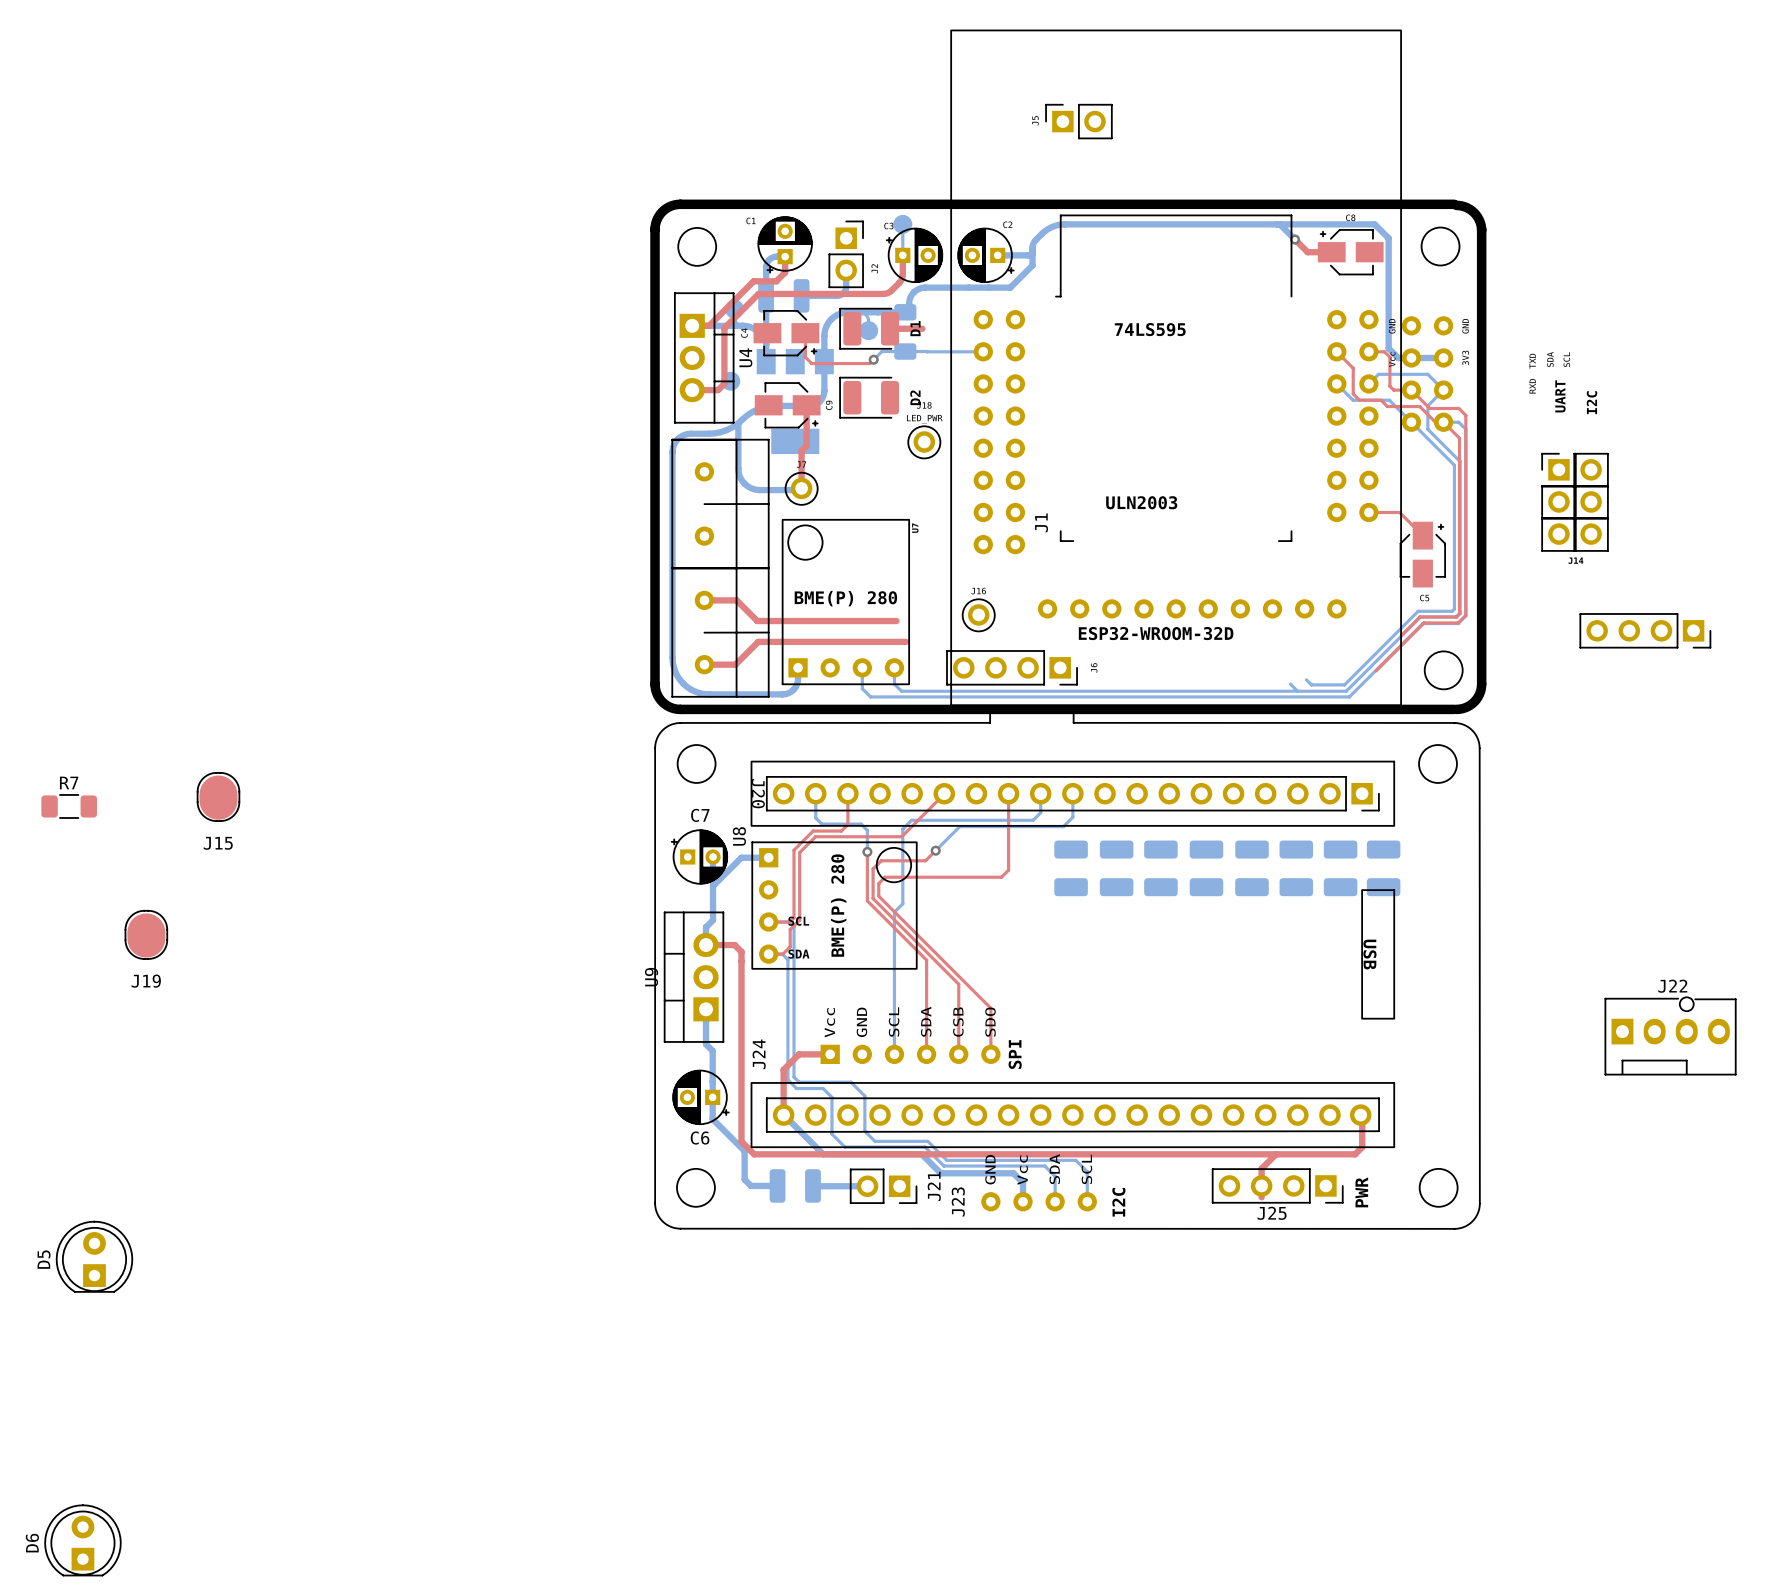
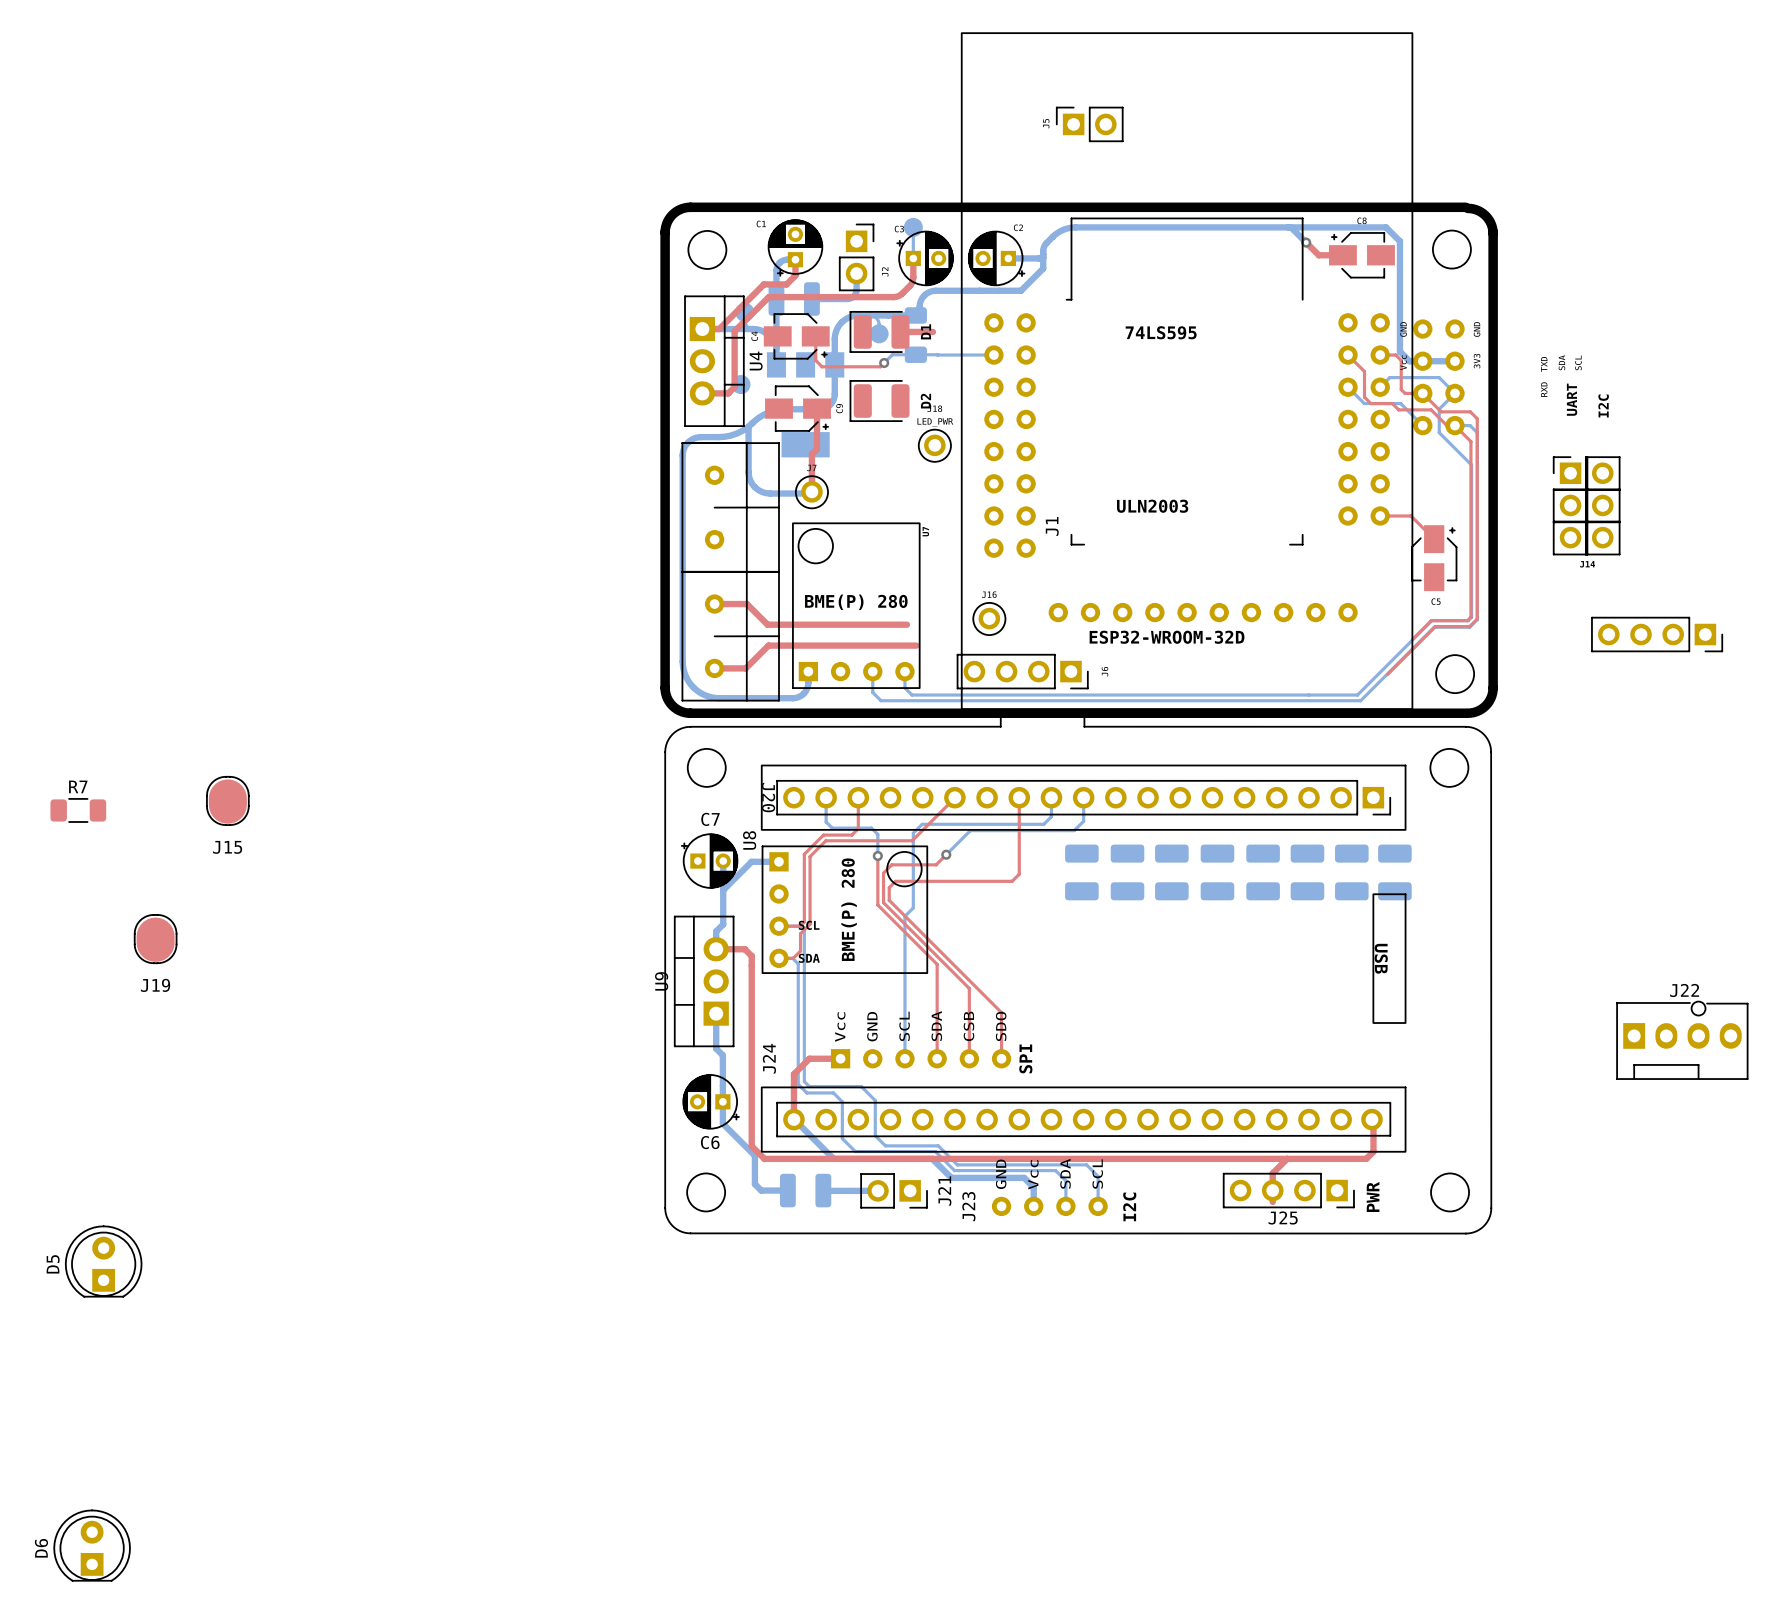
bottom track: (1411, 422) (1454, 465) (1454, 609) (1452, 611) (1418, 611) (1344, 684) (1311, 684) (1306, 679) -> none
bottom track: (1290, 684) (1297, 691) -> none

